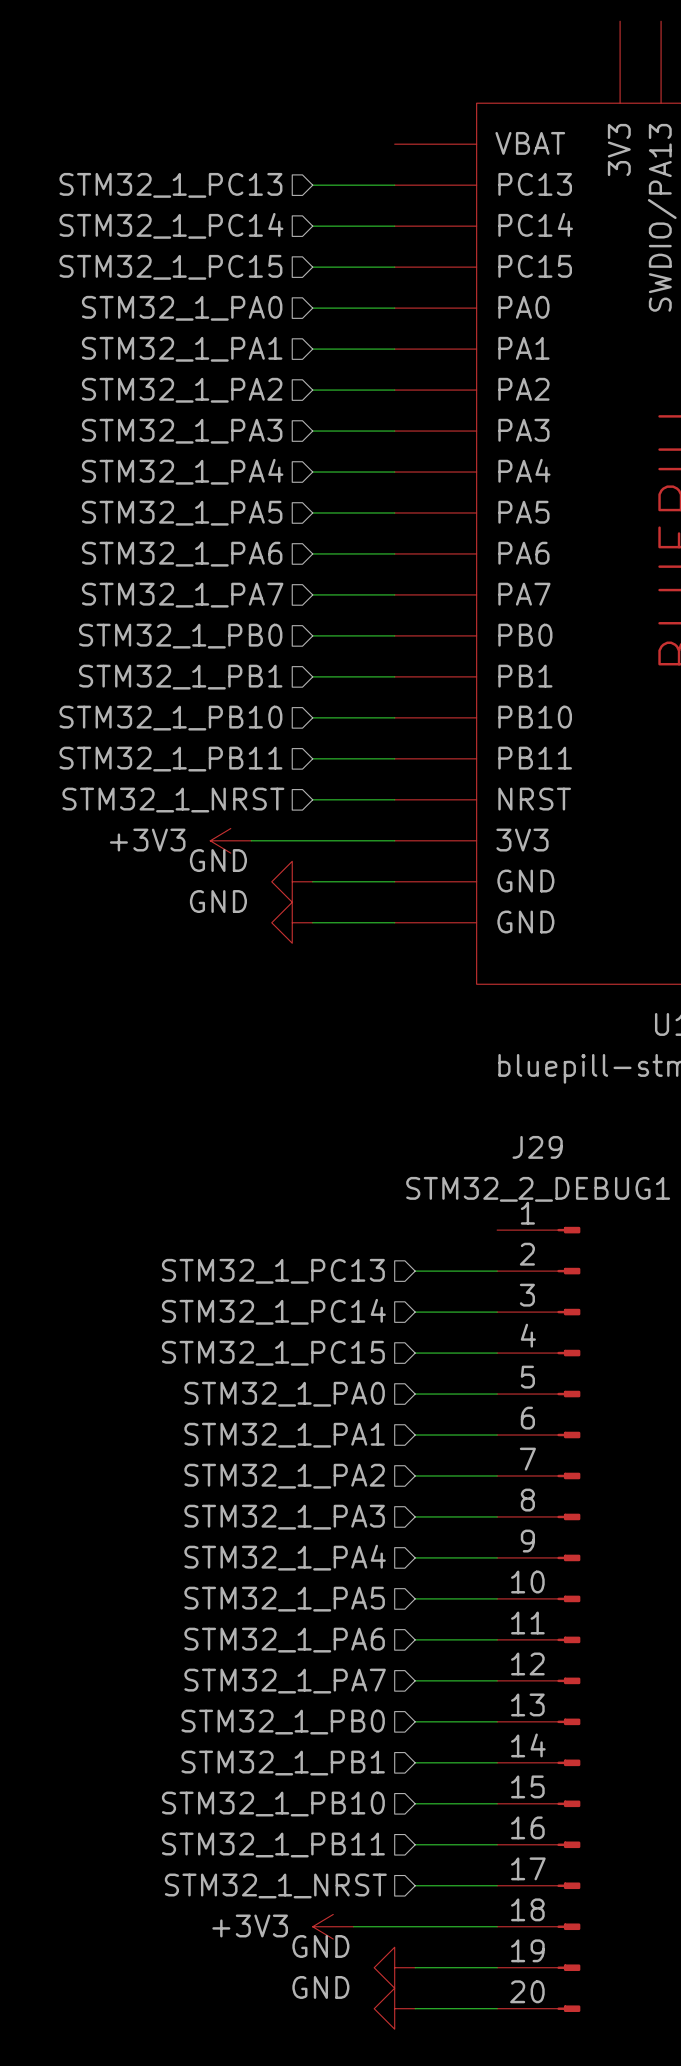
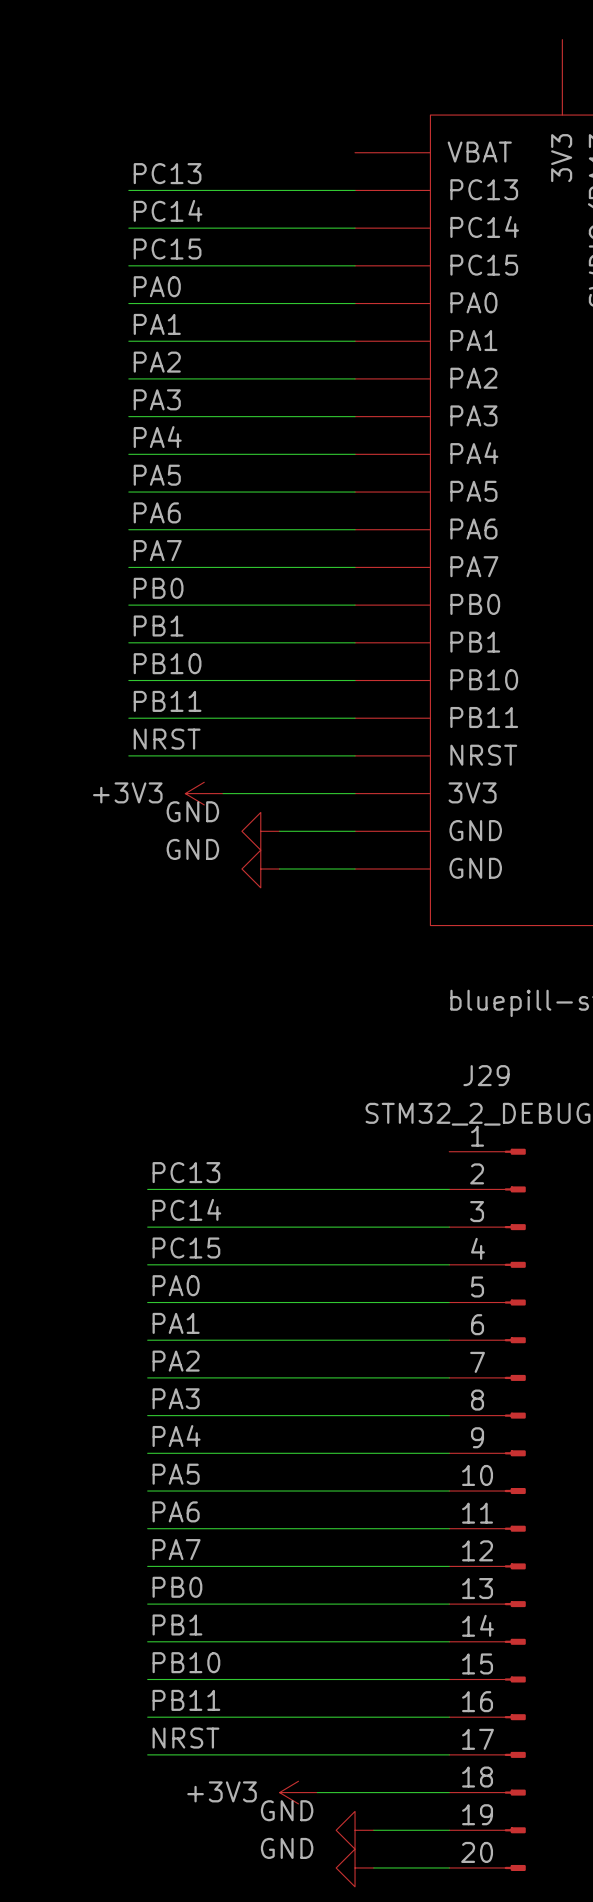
label: none -> PC13 (167, 173)
wire: none -> (128, 190) (279, 190)
hierarchical label: STM32_1_PC13 (170, 185) -> none
label: none -> PC14 (168, 210)
hierarchical label: STM32_1_PC14 (171, 225) -> none
wire: none -> (128, 228) (279, 228)
label: none -> PC15 (167, 249)
wire: none -> (128, 265) (279, 265)
hierarchical label: STM32_1_PC15 (170, 267) -> none
label: none -> PA0 (157, 286)
wire: none -> (128, 303) (279, 303)
hierarchical label: STM32_1_PA0 (182, 308) -> none
label: none -> PA1 (157, 324)
wire: none -> (128, 341) (279, 341)
hierarchical label: STM32_1_PA1 (182, 349) -> none
label: none -> PA2 (157, 362)
wire: none -> (128, 378) (279, 378)
hierarchical label: STM32_1_PA2 (182, 390) -> none
label: none -> PA3 (157, 399)
wire: none -> (128, 416) (279, 416)
hierarchical label: STM32_1_PA3 (182, 431) -> none
label: none -> PA4 (157, 437)
hierarchical label: STM32_1_PA4 (182, 471) -> none
wire: none -> (128, 454) (279, 454)
label: none -> PA5 (157, 475)
wire: none -> (128, 492) (279, 492)
hierarchical label: STM32_1_PA5 (182, 513) -> none
label: none -> PA6 (157, 512)
wire: none -> (128, 529) (279, 529)
hierarchical label: STM32_1_PA6 (182, 554) -> none
label: none -> PA7 (157, 550)
wire: none -> (128, 567) (279, 567)
hierarchical label: STM32_1_PA7 (182, 595) -> none
label: none -> PB0 (158, 588)
wire: none -> (128, 605) (279, 605)
hierarchical label: STM32_1_PB0 (180, 636) -> none
label: none -> PB1 (158, 625)
wire: none -> (128, 642) (279, 642)
hierarchical label: STM32_1_PB1 (180, 677) -> none
label: none -> PB10 (167, 663)
wire: none -> (128, 680) (279, 680)
hierarchical label: STM32_1_PB10 (170, 718) -> none
label: none -> PB11 (167, 701)
wire: none -> (128, 718) (279, 718)
hierarchical label: STM32_1_PB11 (170, 759) -> none
label: none -> NRST (167, 739)
wire: none -> (128, 755) (279, 755)
hierarchical label: STM32_1_NRST (173, 800) -> none
label: none -> PC13 (186, 1172)
wire: none -> (147, 1189) (373, 1189)
hierarchical label: STM32_1_PC13 (273, 1271) -> none
label: none -> PC14 (186, 1209)
hierarchical label: STM32_1_PC14 (273, 1311) -> none
wire: none -> (147, 1227) (373, 1227)
label: none -> PC15 (186, 1248)
wire: none -> (147, 1264) (373, 1264)
hierarchical label: STM32_1_PC15 (273, 1353) -> none
label: none -> PA0 (176, 1285)
wire: none -> (147, 1302) (373, 1302)
hierarchical label: STM32_1_PA0 (284, 1394) -> none
label: none -> PA1 (176, 1323)
wire: none -> (147, 1340) (373, 1340)
hierarchical label: STM32_1_PA1 (284, 1435) -> none
label: none -> PA2 (176, 1361)
wire: none -> (147, 1377) (373, 1377)
hierarchical label: STM32_1_PA2 (284, 1476) -> none
label: none -> PA3 (176, 1398)
wire: none -> (147, 1415) (373, 1415)
hierarchical label: STM32_1_PA3 (284, 1517) -> none
label: none -> PA4 (176, 1436)
wire: none -> (147, 1453) (373, 1453)
hierarchical label: STM32_1_PA4 (285, 1557) -> none
label: none -> PA5 (176, 1474)
wire: none -> (147, 1491) (373, 1491)
hierarchical label: STM32_1_PA5 (284, 1599) -> none
label: none -> PA6 (176, 1511)
wire: none -> (147, 1528) (373, 1528)
hierarchical label: STM32_1_PA6 (284, 1640) -> none
label: none -> PA7 (176, 1549)
wire: none -> (147, 1566) (373, 1566)
hierarchical label: STM32_1_PA7 (285, 1681) -> none
label: none -> PB0 (177, 1587)
wire: none -> (147, 1604) (373, 1604)
hierarchical label: STM32_1_PB0 (283, 1722) -> none
label: none -> PB1 (177, 1624)
wire: none -> (147, 1641) (373, 1641)
hierarchical label: STM32_1_PB1 (283, 1763) -> none
label: none -> PB10 (186, 1662)
wire: none -> (147, 1679) (373, 1679)
hierarchical label: STM32_1_PB10 (273, 1804) -> none
label: none -> PB11 (186, 1700)
wire: none -> (147, 1717) (373, 1717)
hierarchical label: STM32_1_PB11 (273, 1845) -> none
label: none -> NRST (185, 1738)
wire: none -> (147, 1754) (373, 1754)
hierarchical label: STM32_1_NRST (275, 1885) -> none

